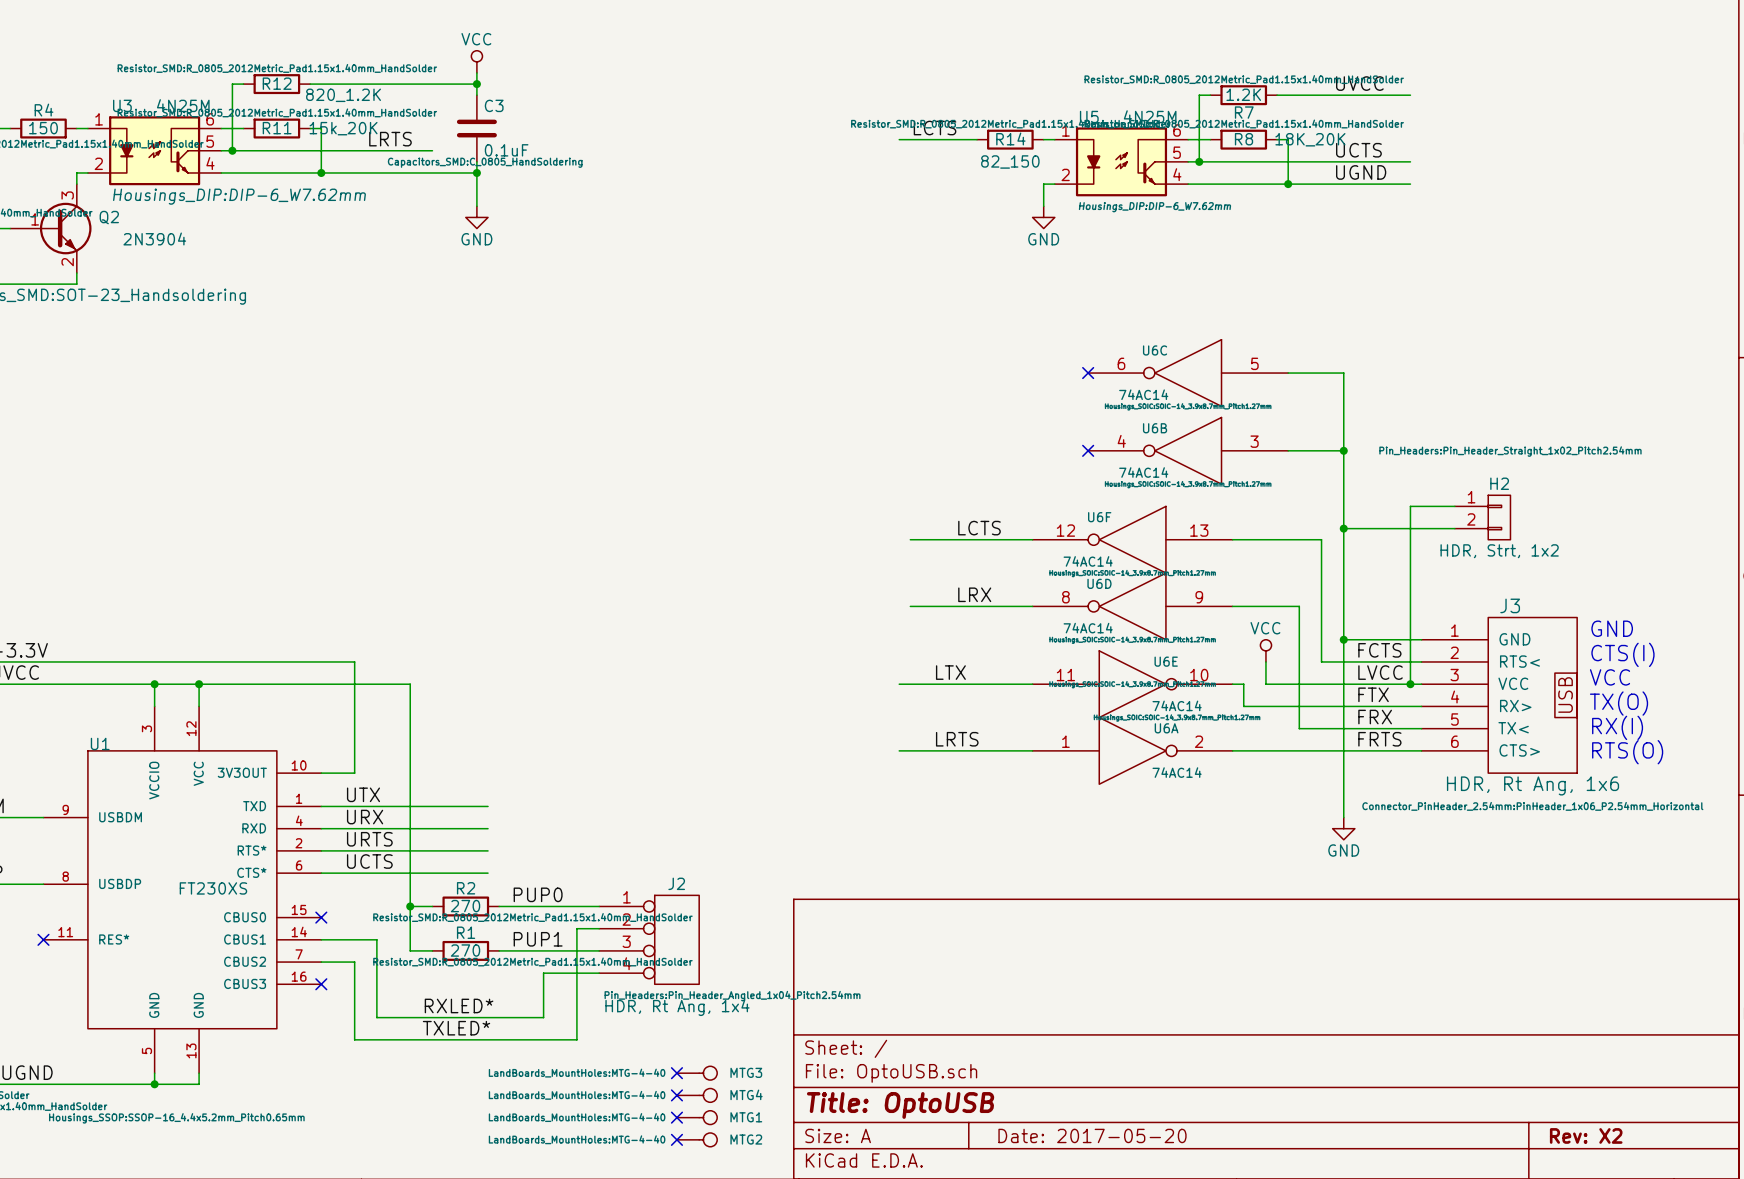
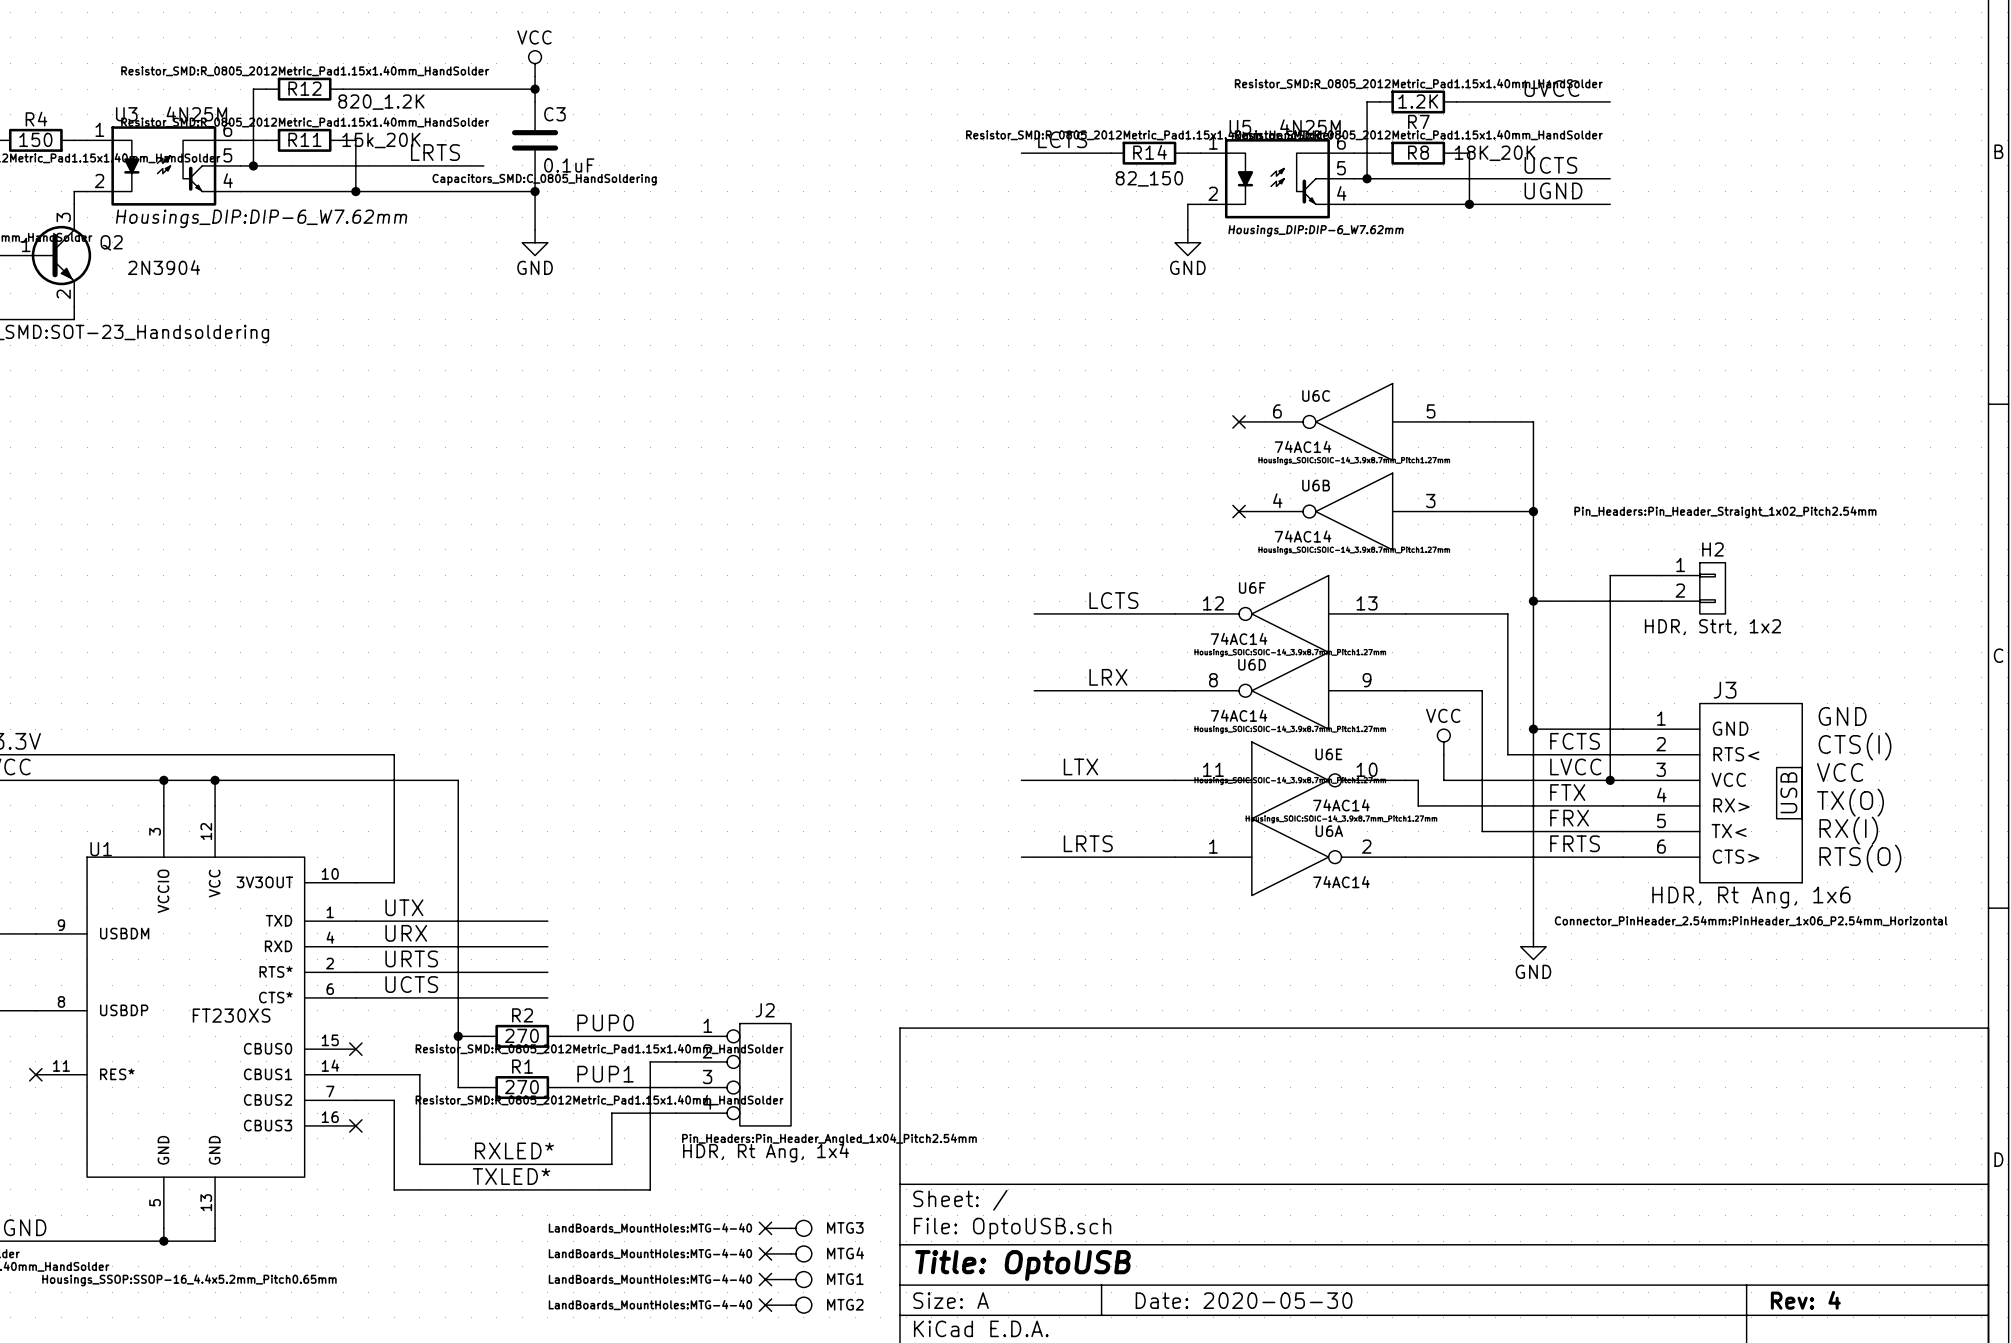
title block: Date: 2017-05-20 (1092, 1135) -> Date: 2020-05-30 (1244, 1300)
title block: Rev: X2 (1586, 1135) -> Rev: 4 (1805, 1300)

